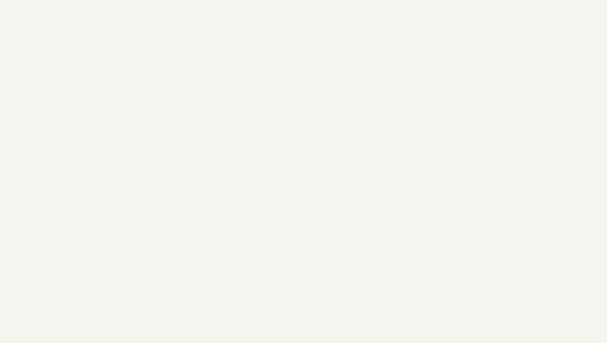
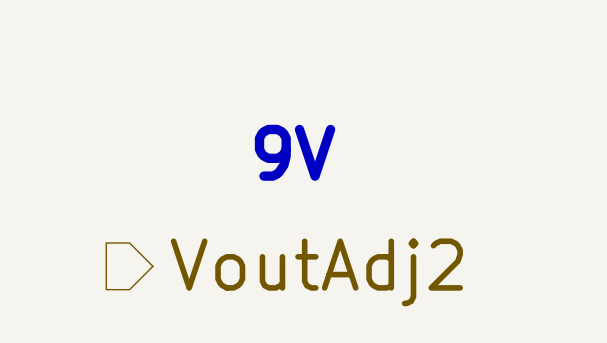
text: none -> 9V (295, 152)
hierarchical label: none -> VoutAdj2 (316, 272)

